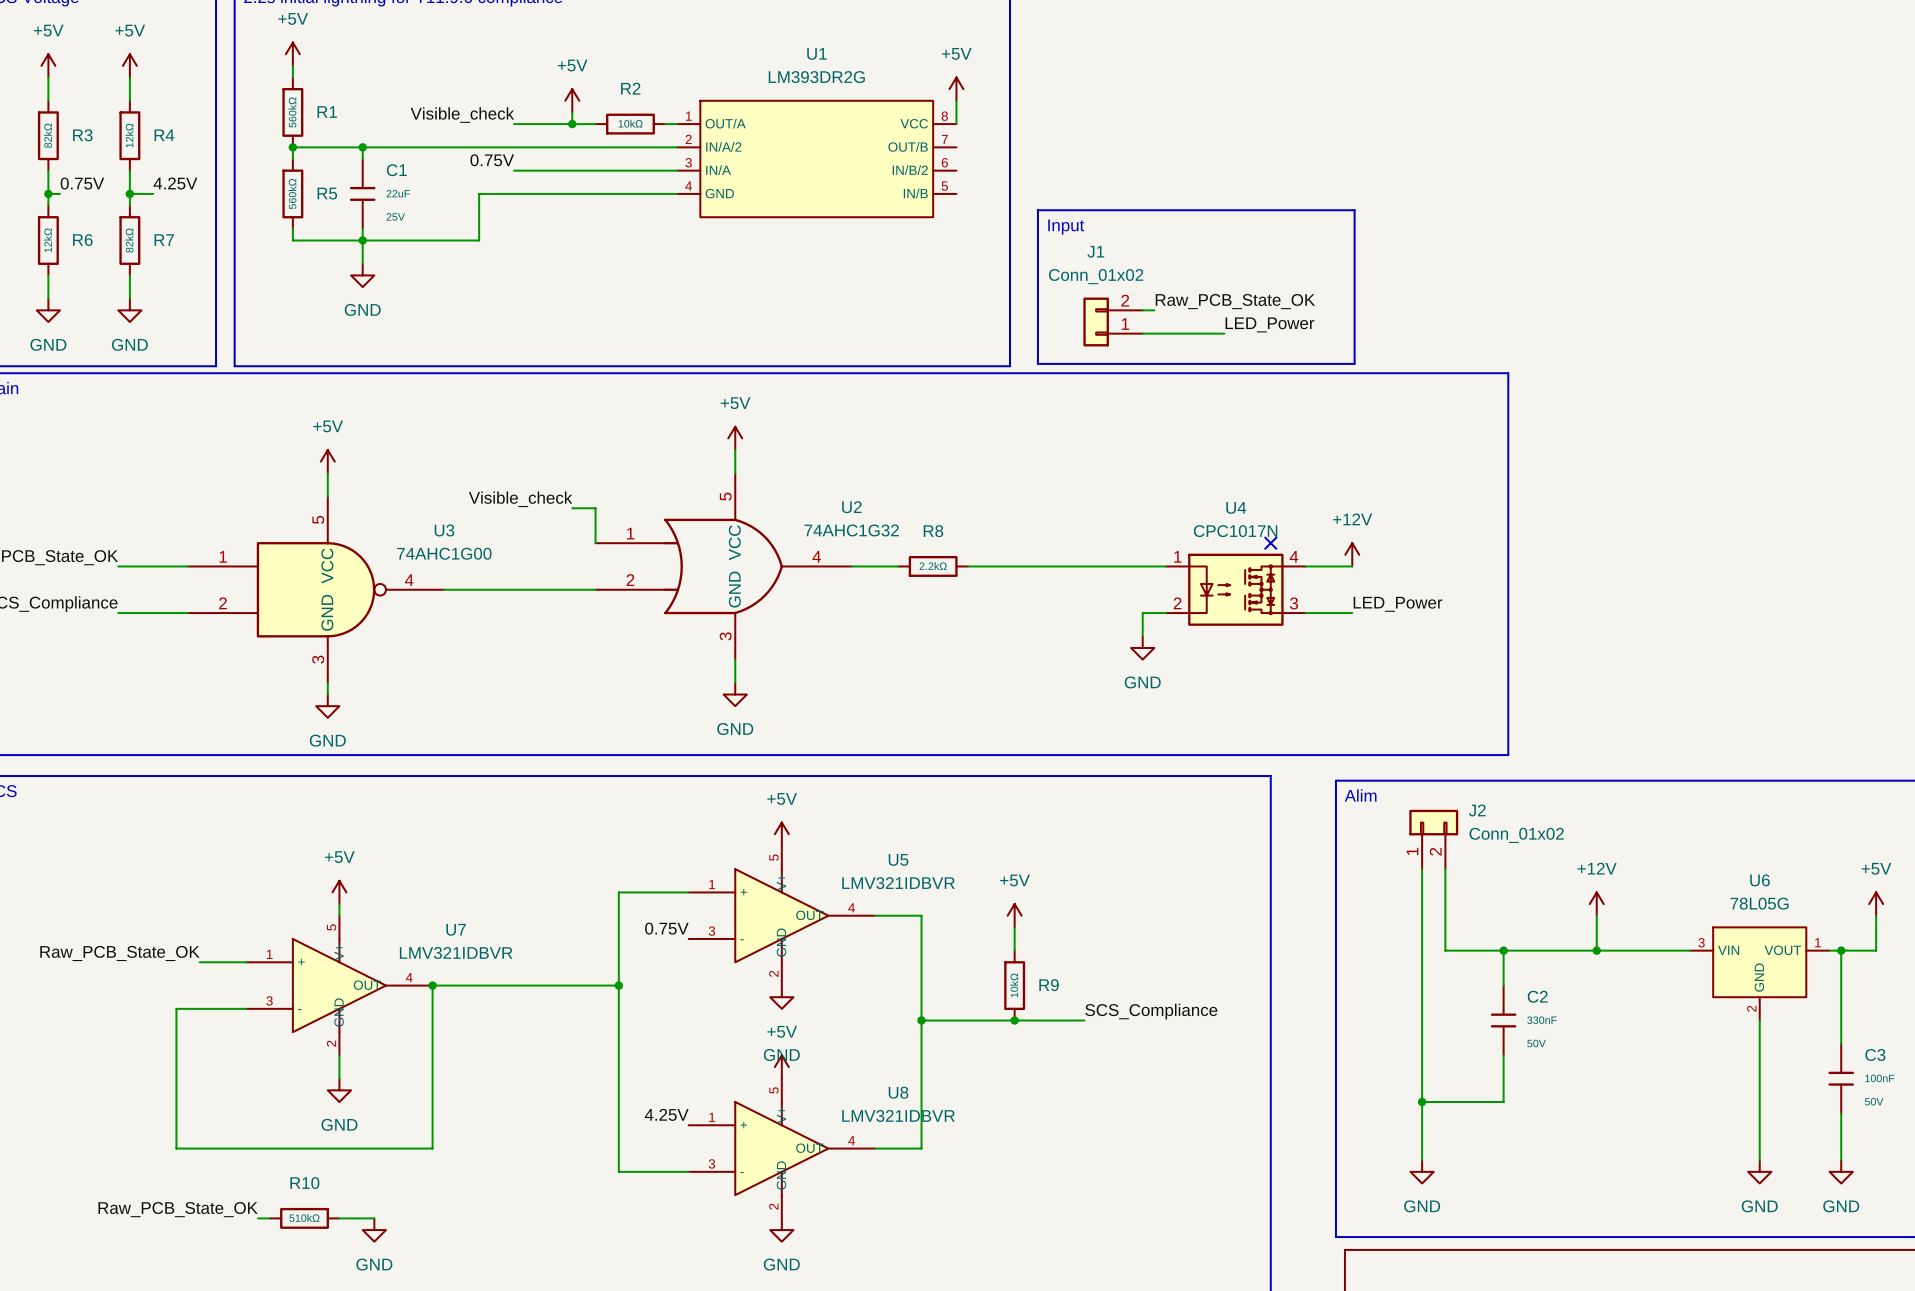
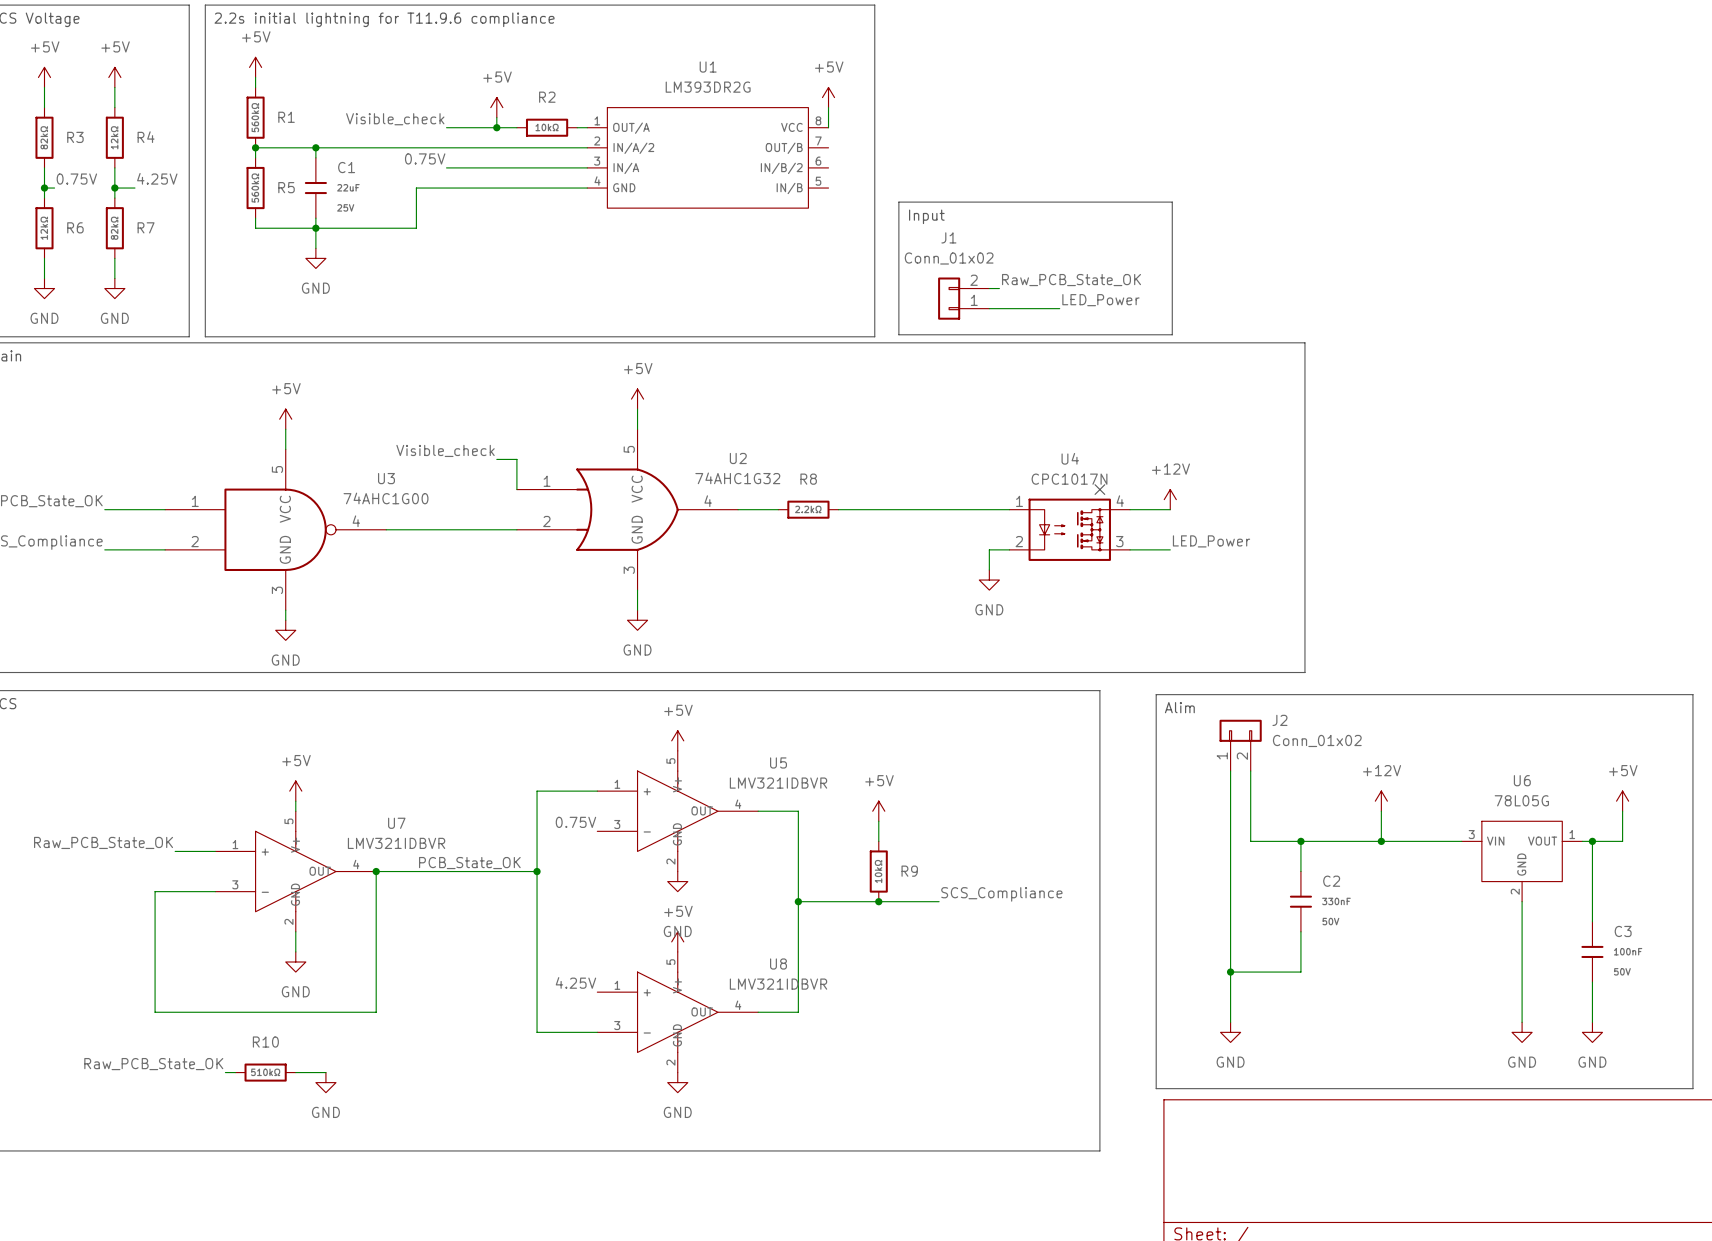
label: none -> PCB_State_OK (469, 863)

